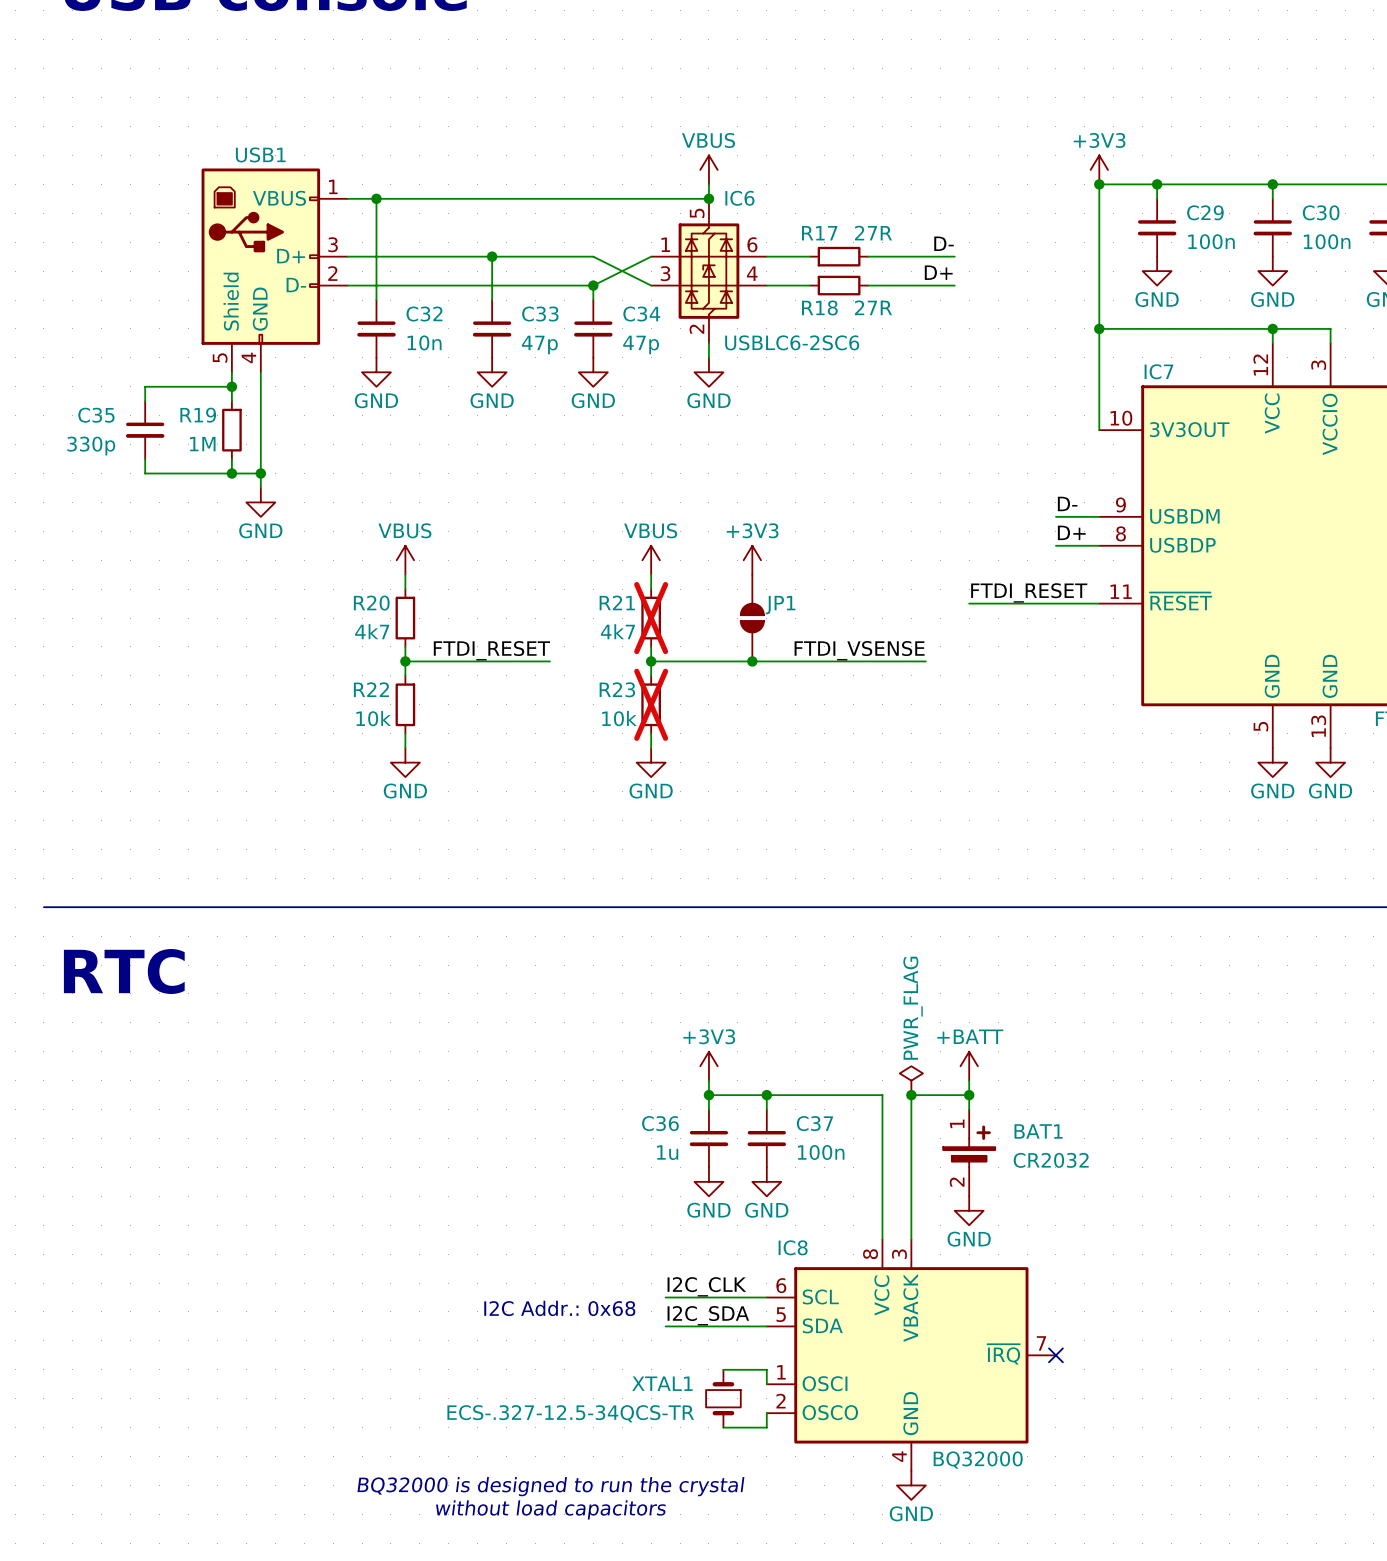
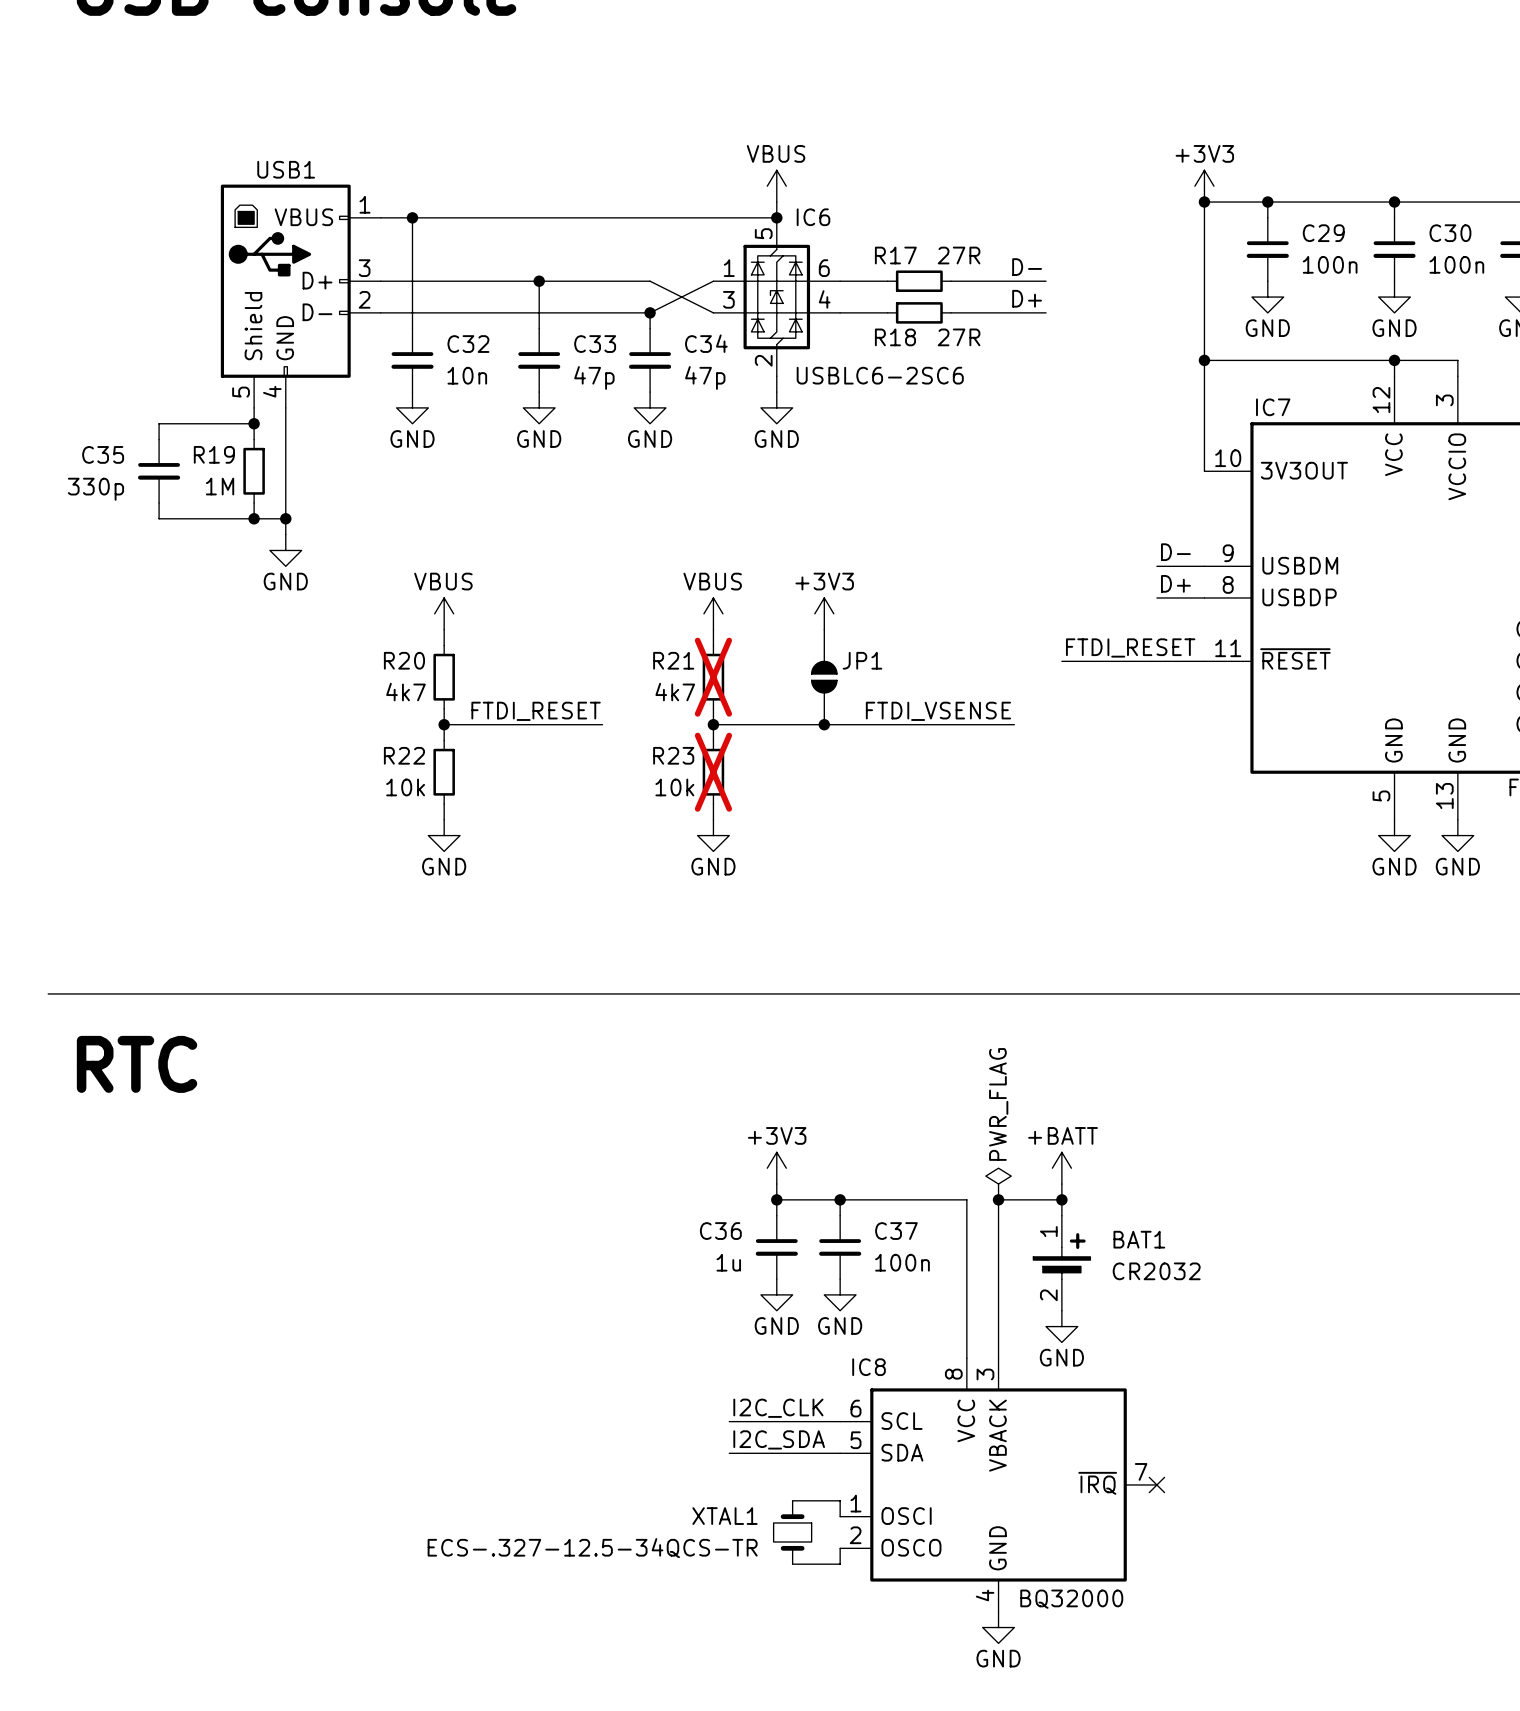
text: I2C Addr.: 0x68 (559, 1308) -> none
text: BQ32000 is designed to run the crystal (550, 1486) -> none
text: without load capacitors (550, 1509) -> none

